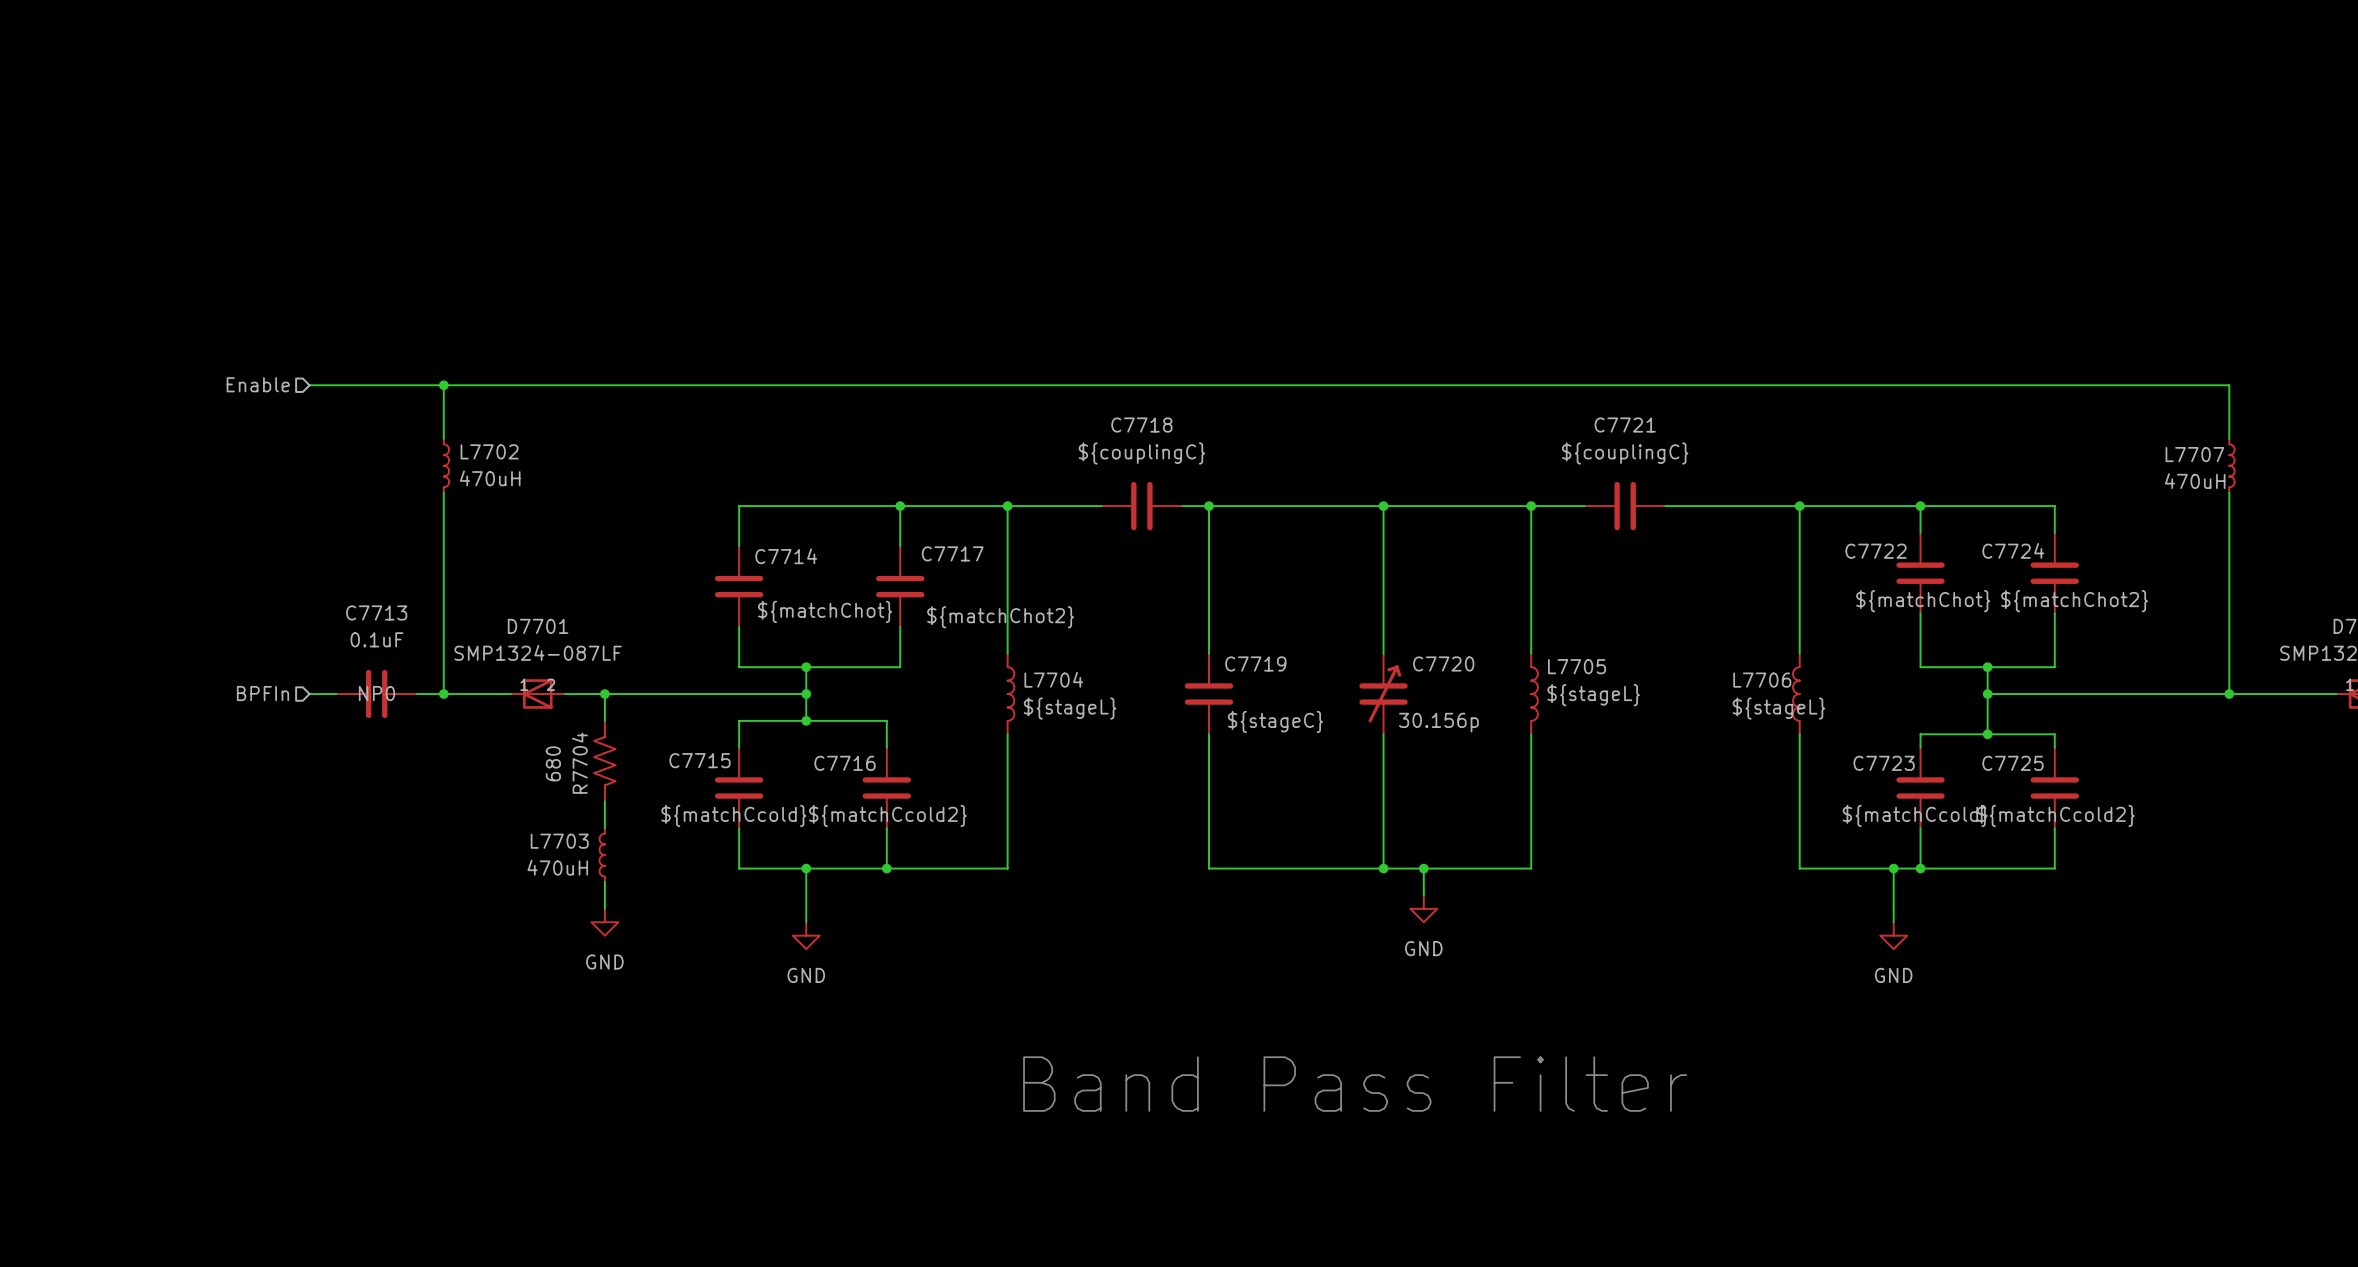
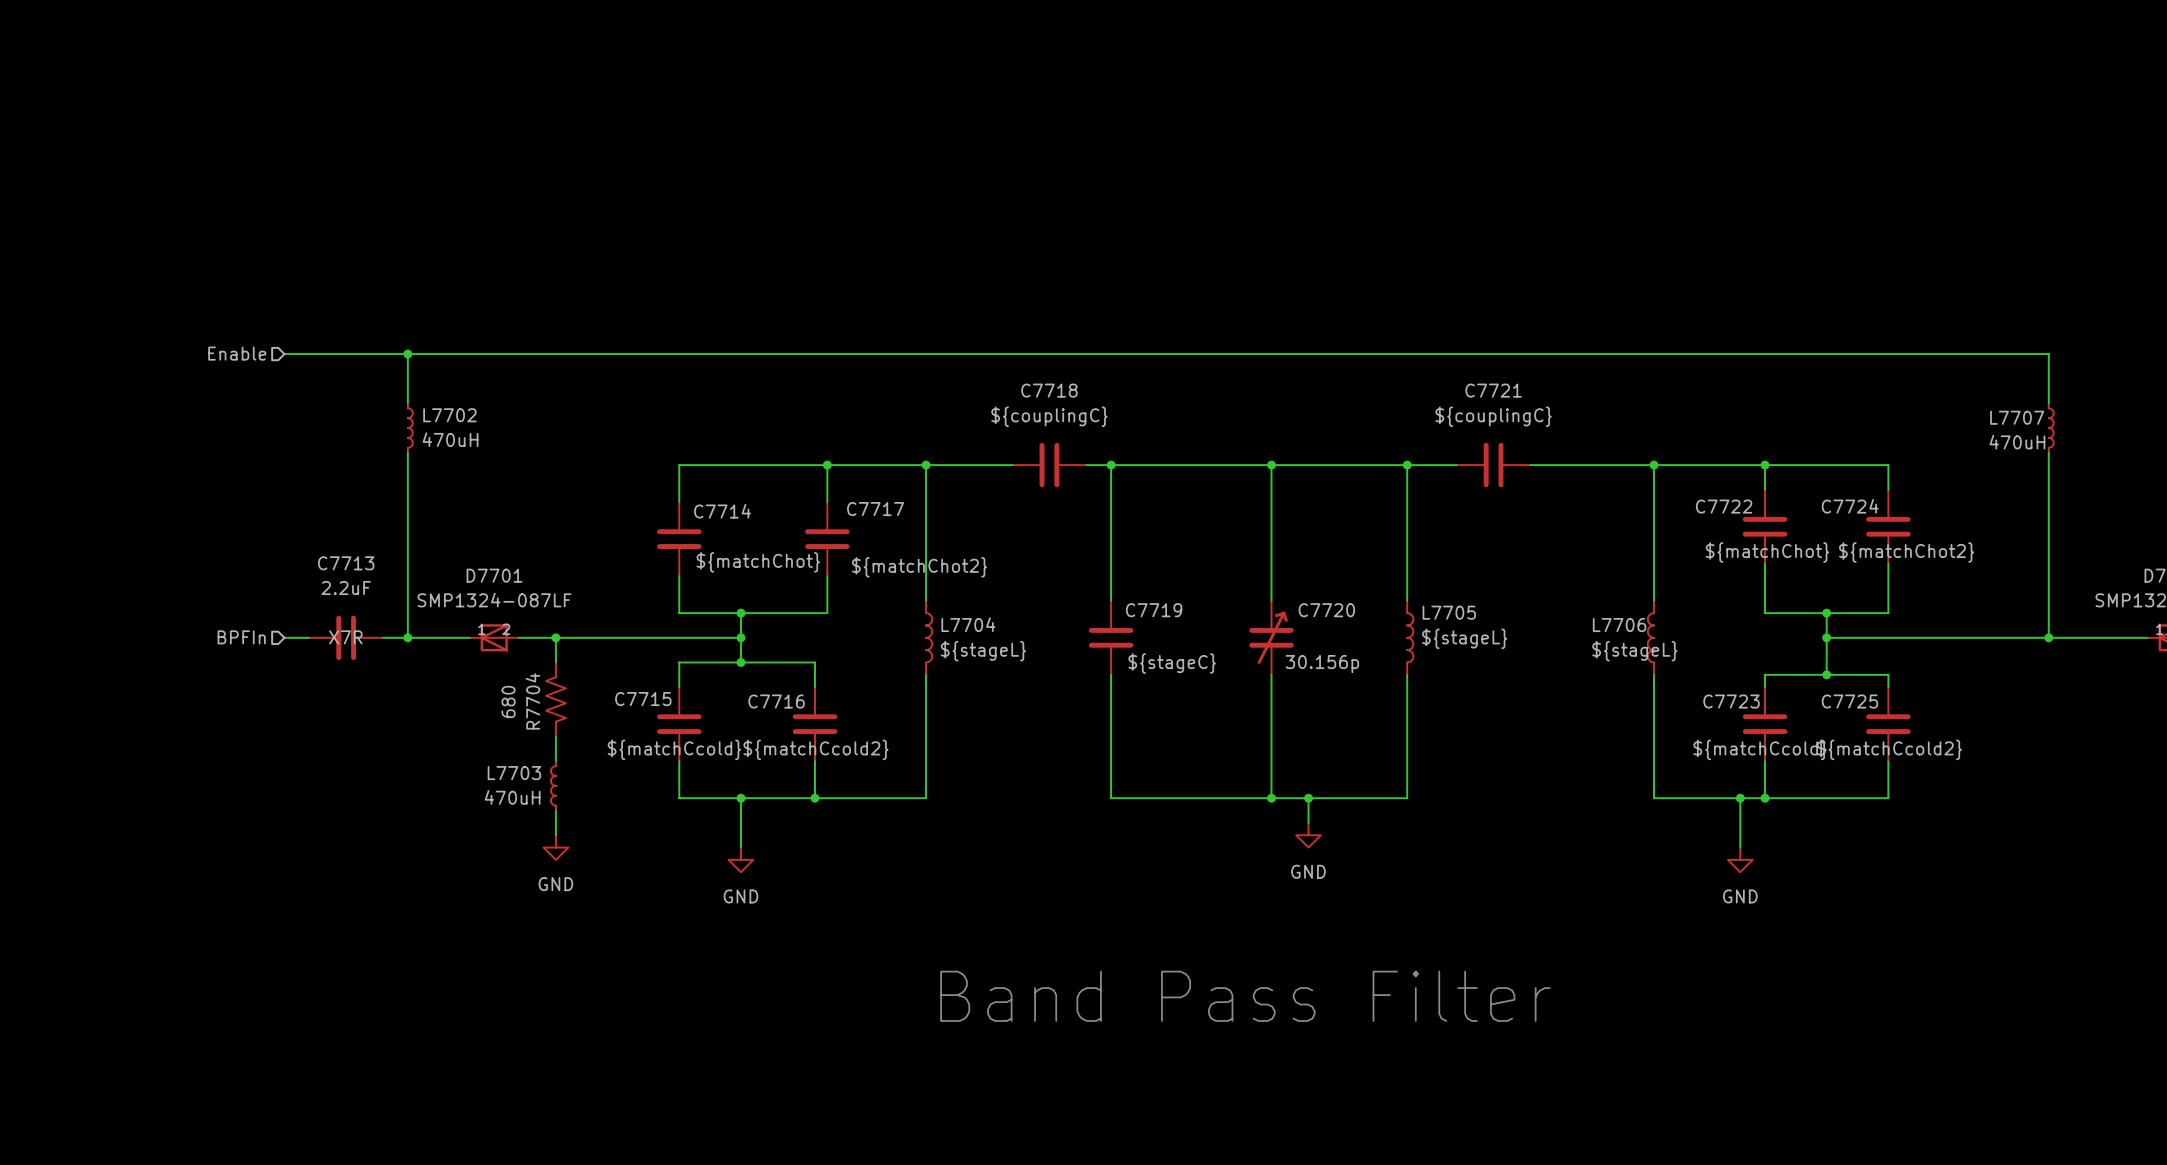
C7713 value: 0.1uF (376, 639) -> 2.2uF (346, 588)
C7713 text: NP0 (376, 693) -> X7R (345, 637)

